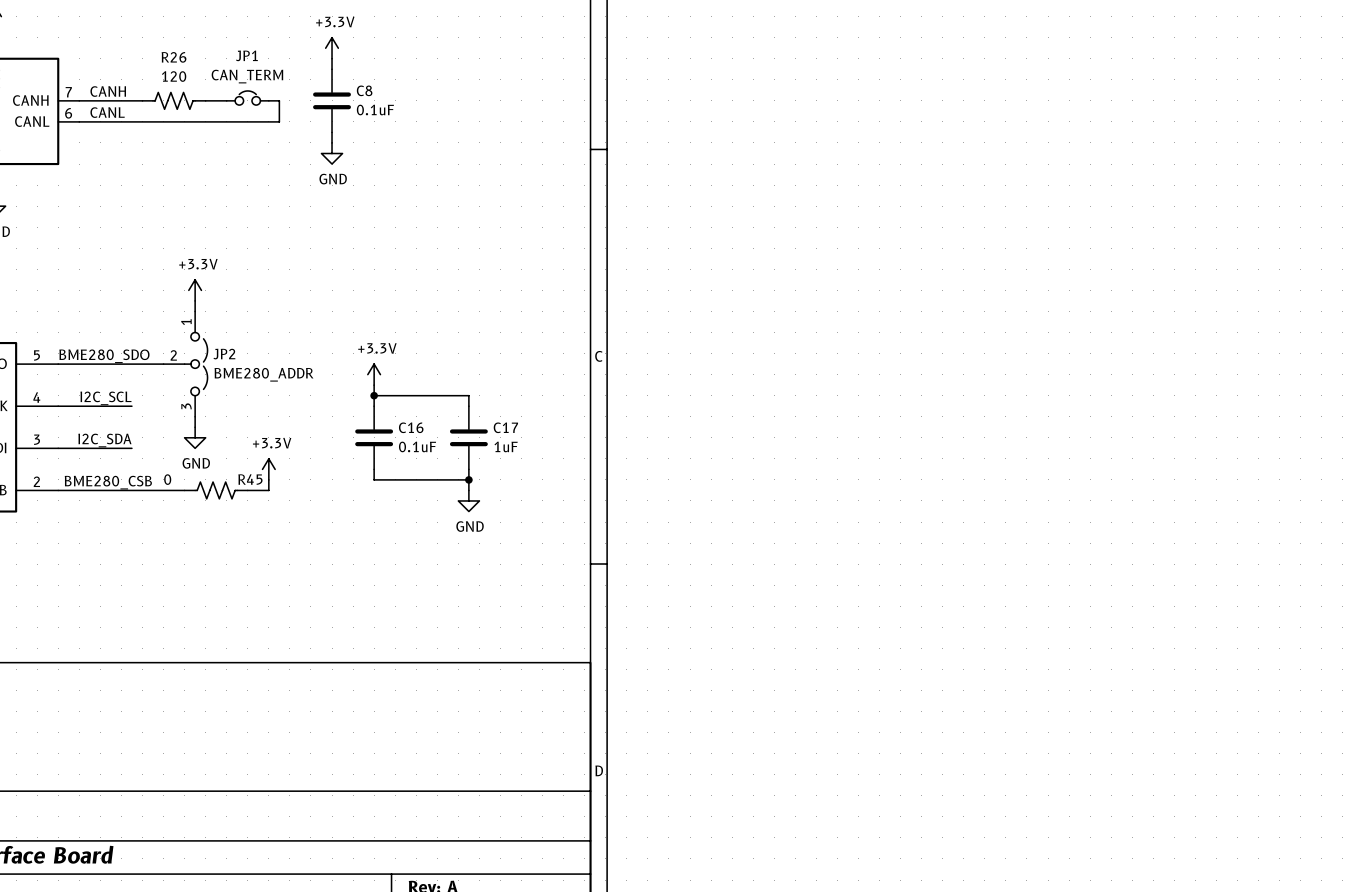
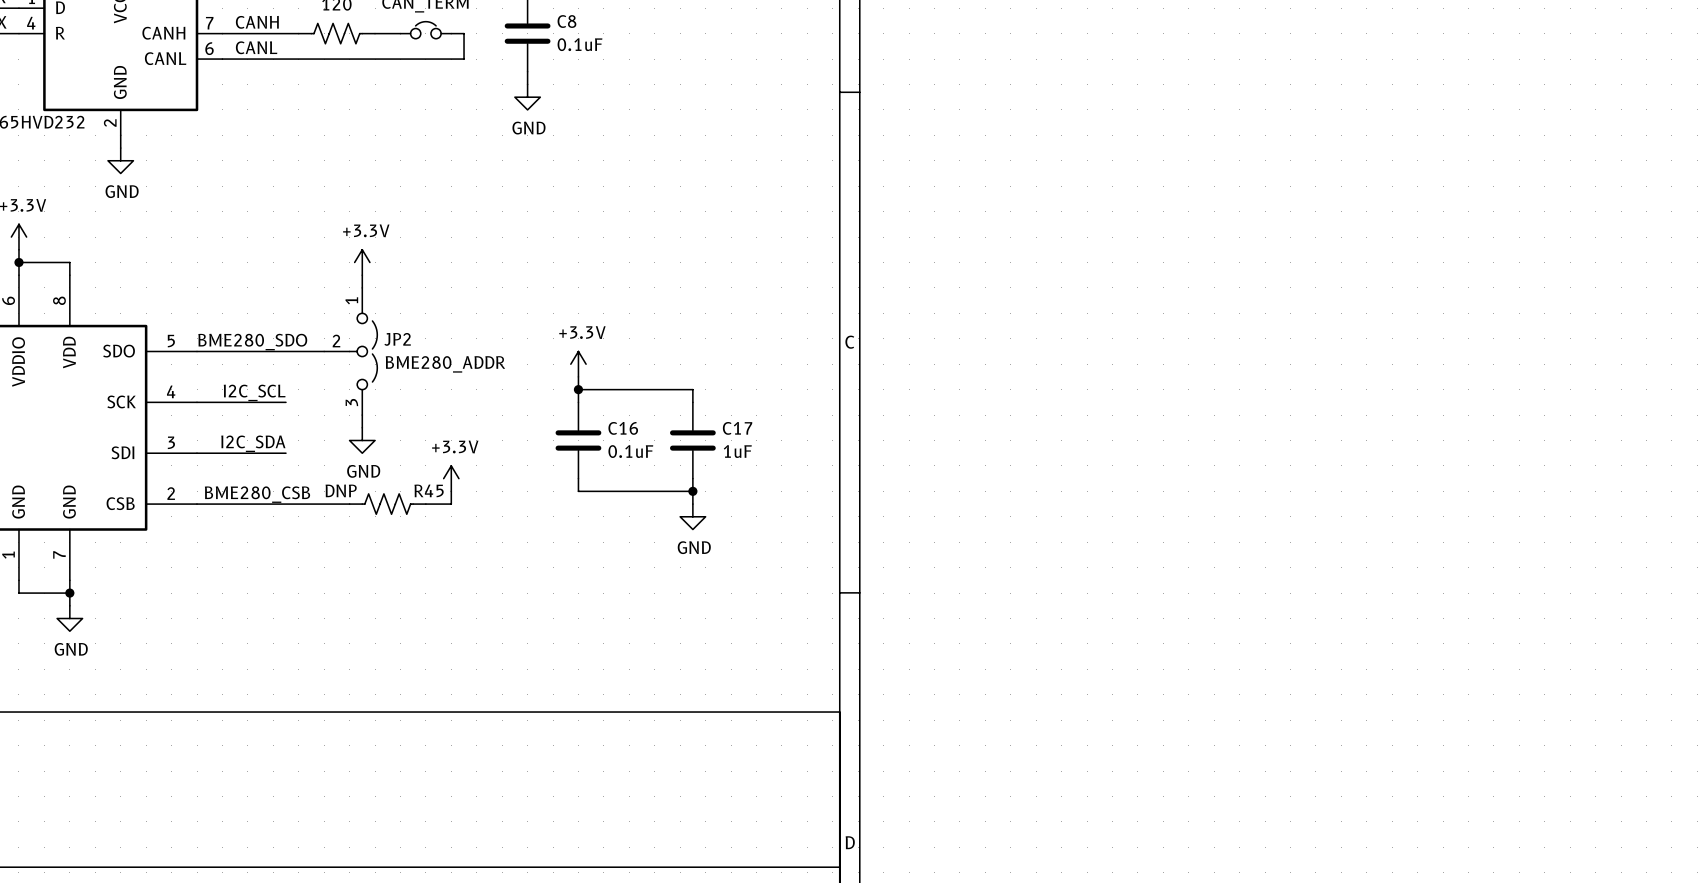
R45 value: 0 (167, 479) -> DNP (341, 490)

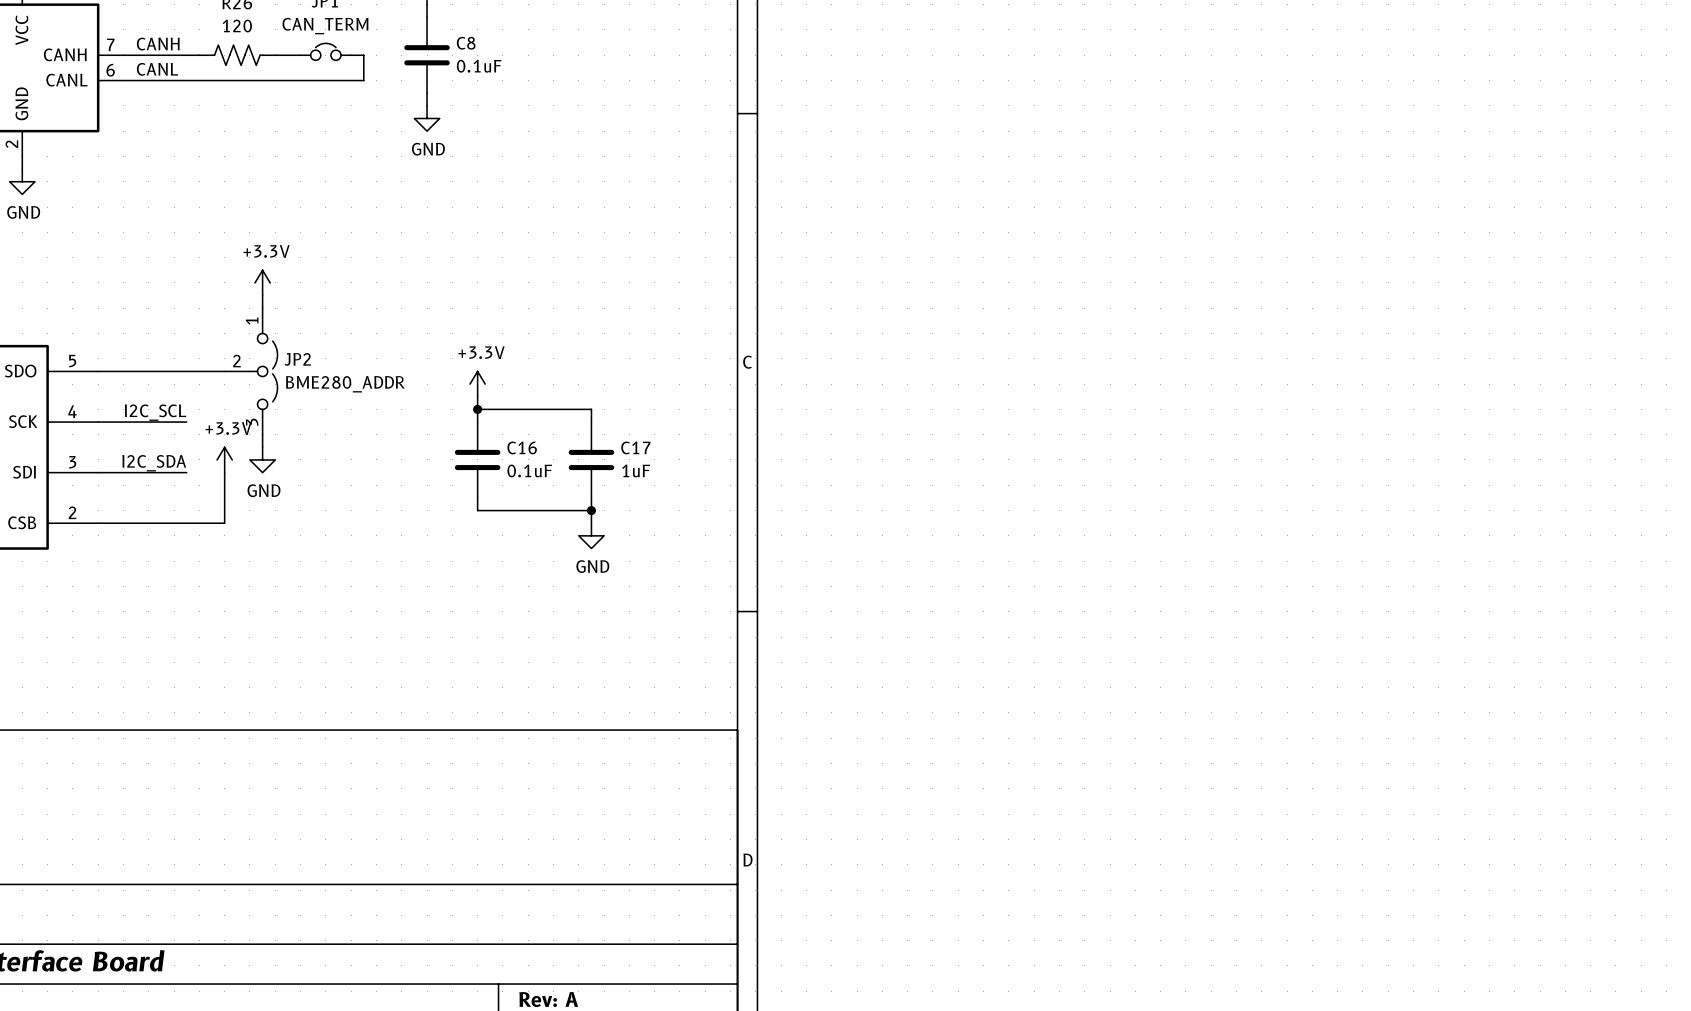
label: BME280_SDO (252, 342) -> none
power symbol position: +3.3V (451, 478) -> +3.3V (224, 459)
wire: (451, 491) (451, 504) (425, 504) -> none
label: BME280_CSB (257, 494) -> none
wire: (324, 504) (349, 504) -> (224, 523) (224, 472)
R45: DNP (387, 504) -> none

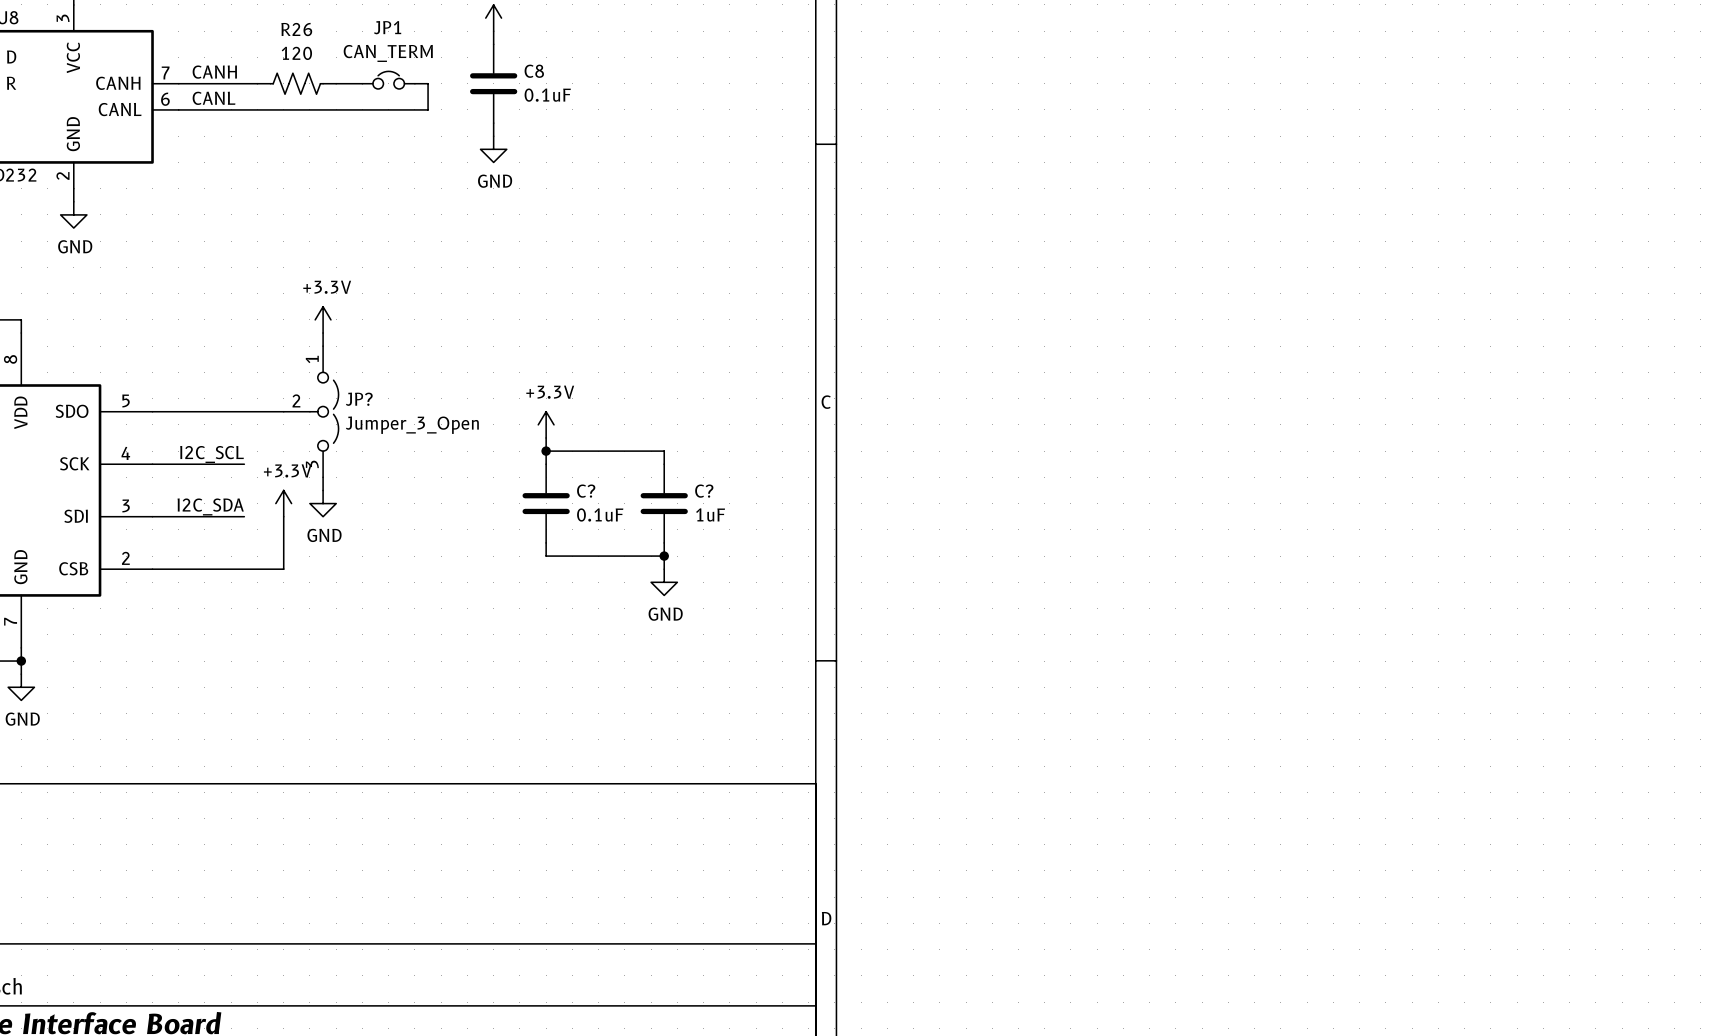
JP2 name: JP2 (297, 359) -> JP? (359, 399)
JP2 value: BME280_ADDR (345, 384) -> Jumper_3_Open (412, 425)
C16 name: C16 (522, 447) -> C? (586, 491)
C17 name: C17 (635, 447) -> C? (704, 491)

